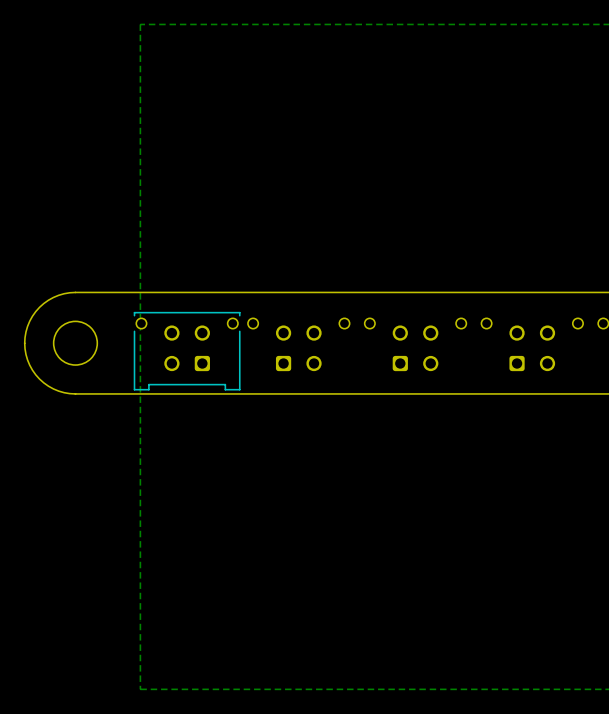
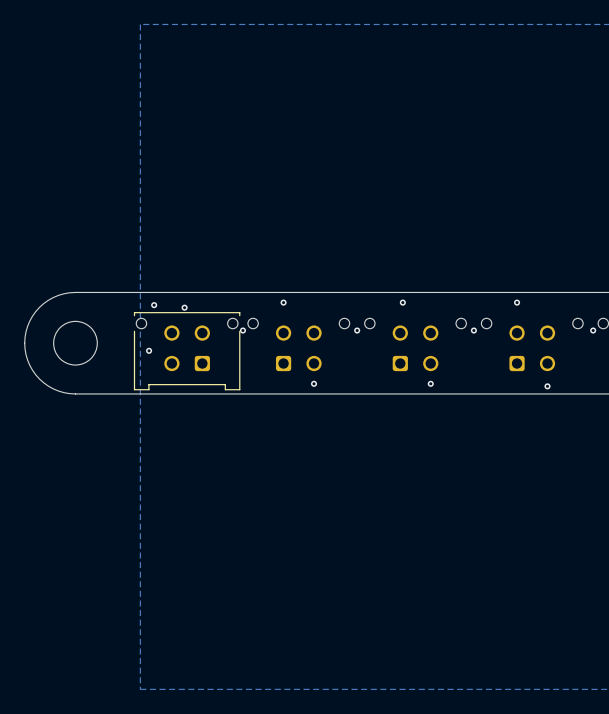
via: none -> (283, 302)
via: none -> (402, 302)
via: none -> (517, 302)
via: none -> (154, 305)
via: none -> (184, 307)
via: none -> (242, 330)
via: none -> (357, 330)
via: none -> (473, 330)
via: none -> (593, 330)
via: none -> (149, 350)
via: none -> (314, 383)
via: none -> (430, 383)
via: none -> (547, 386)

